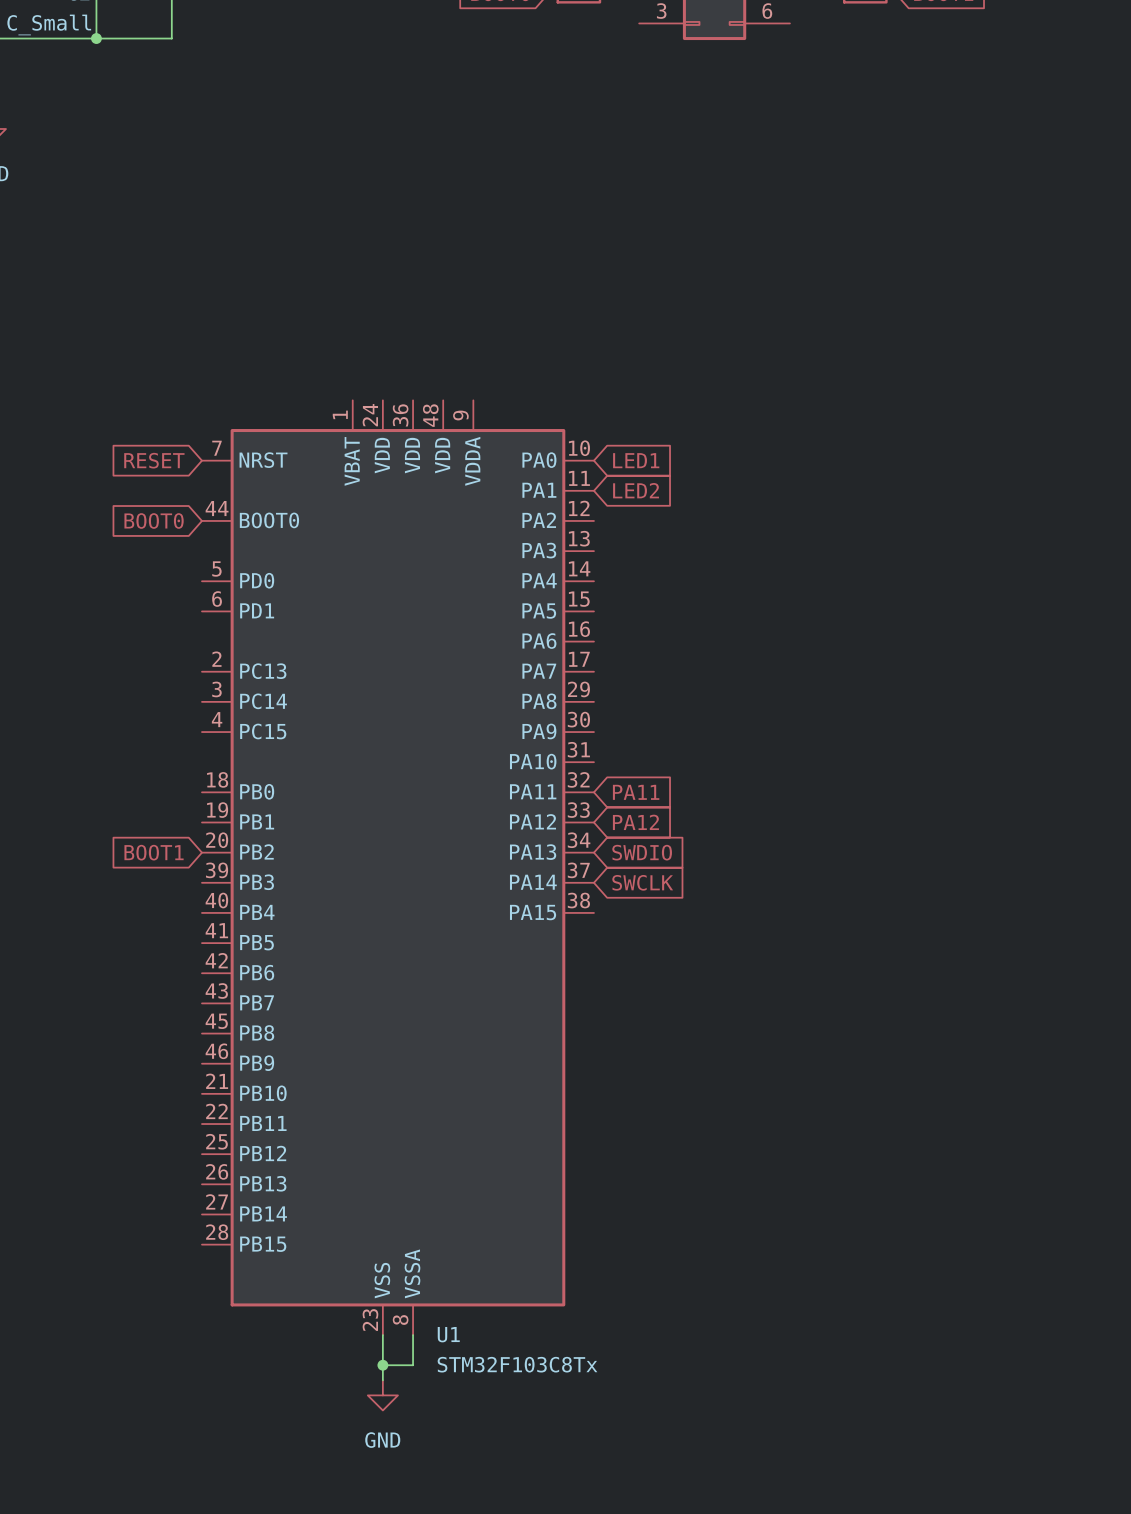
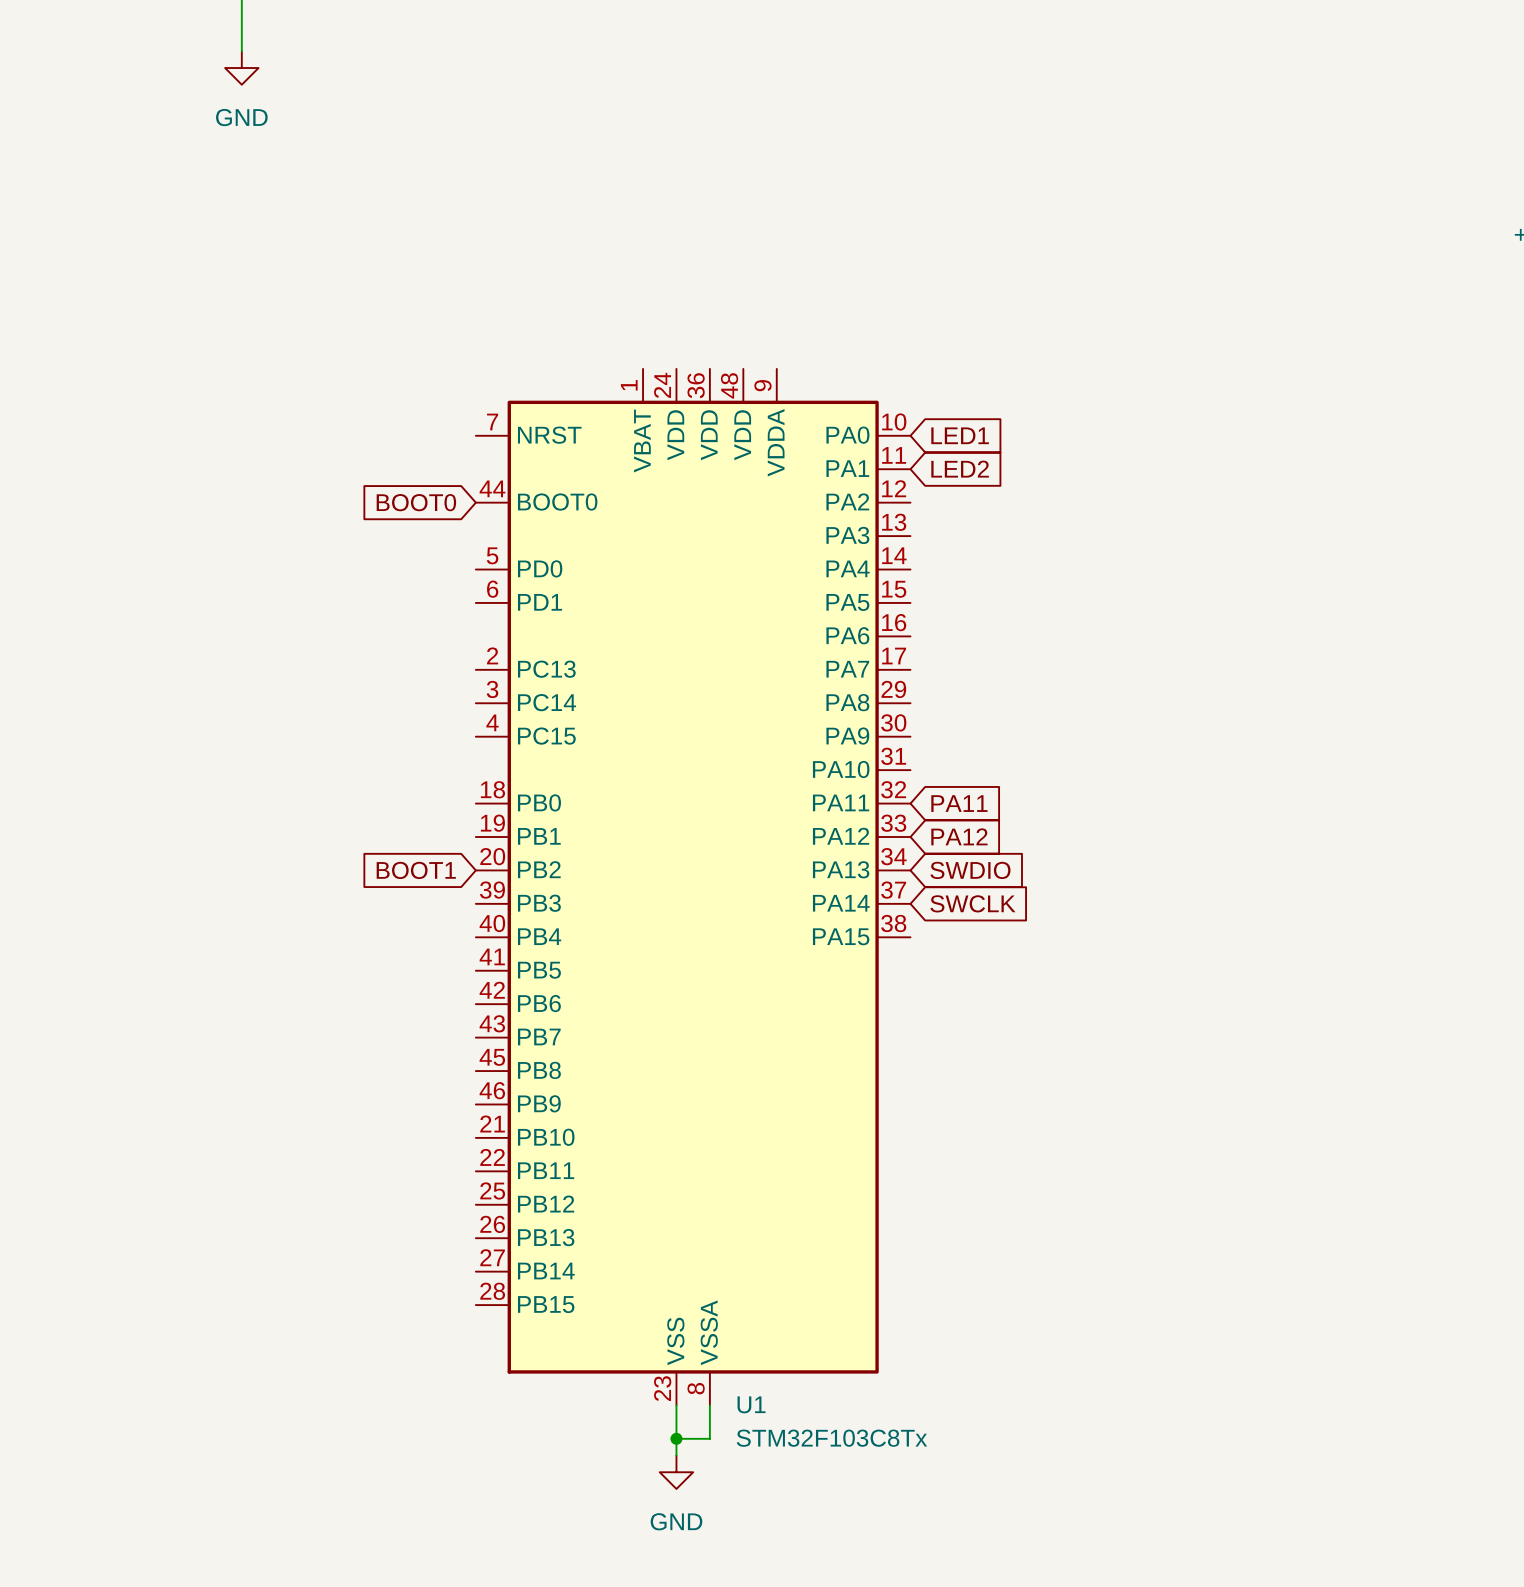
global label: RESET (154, 460) -> none

